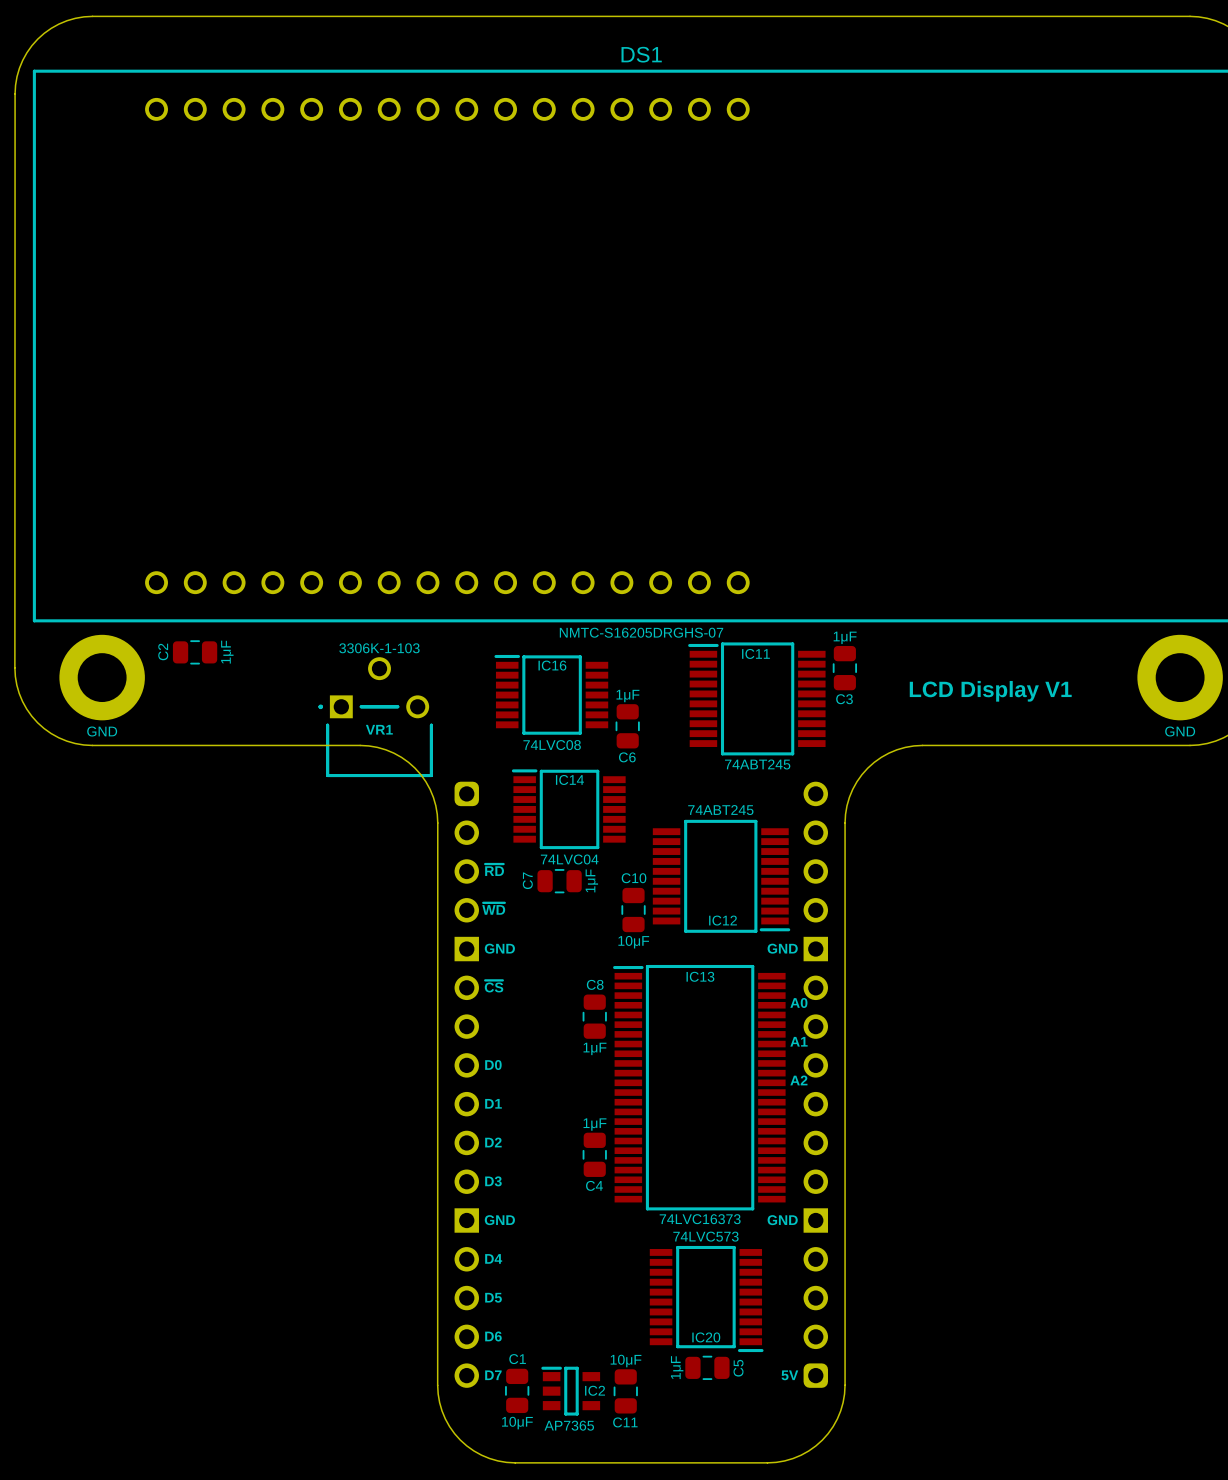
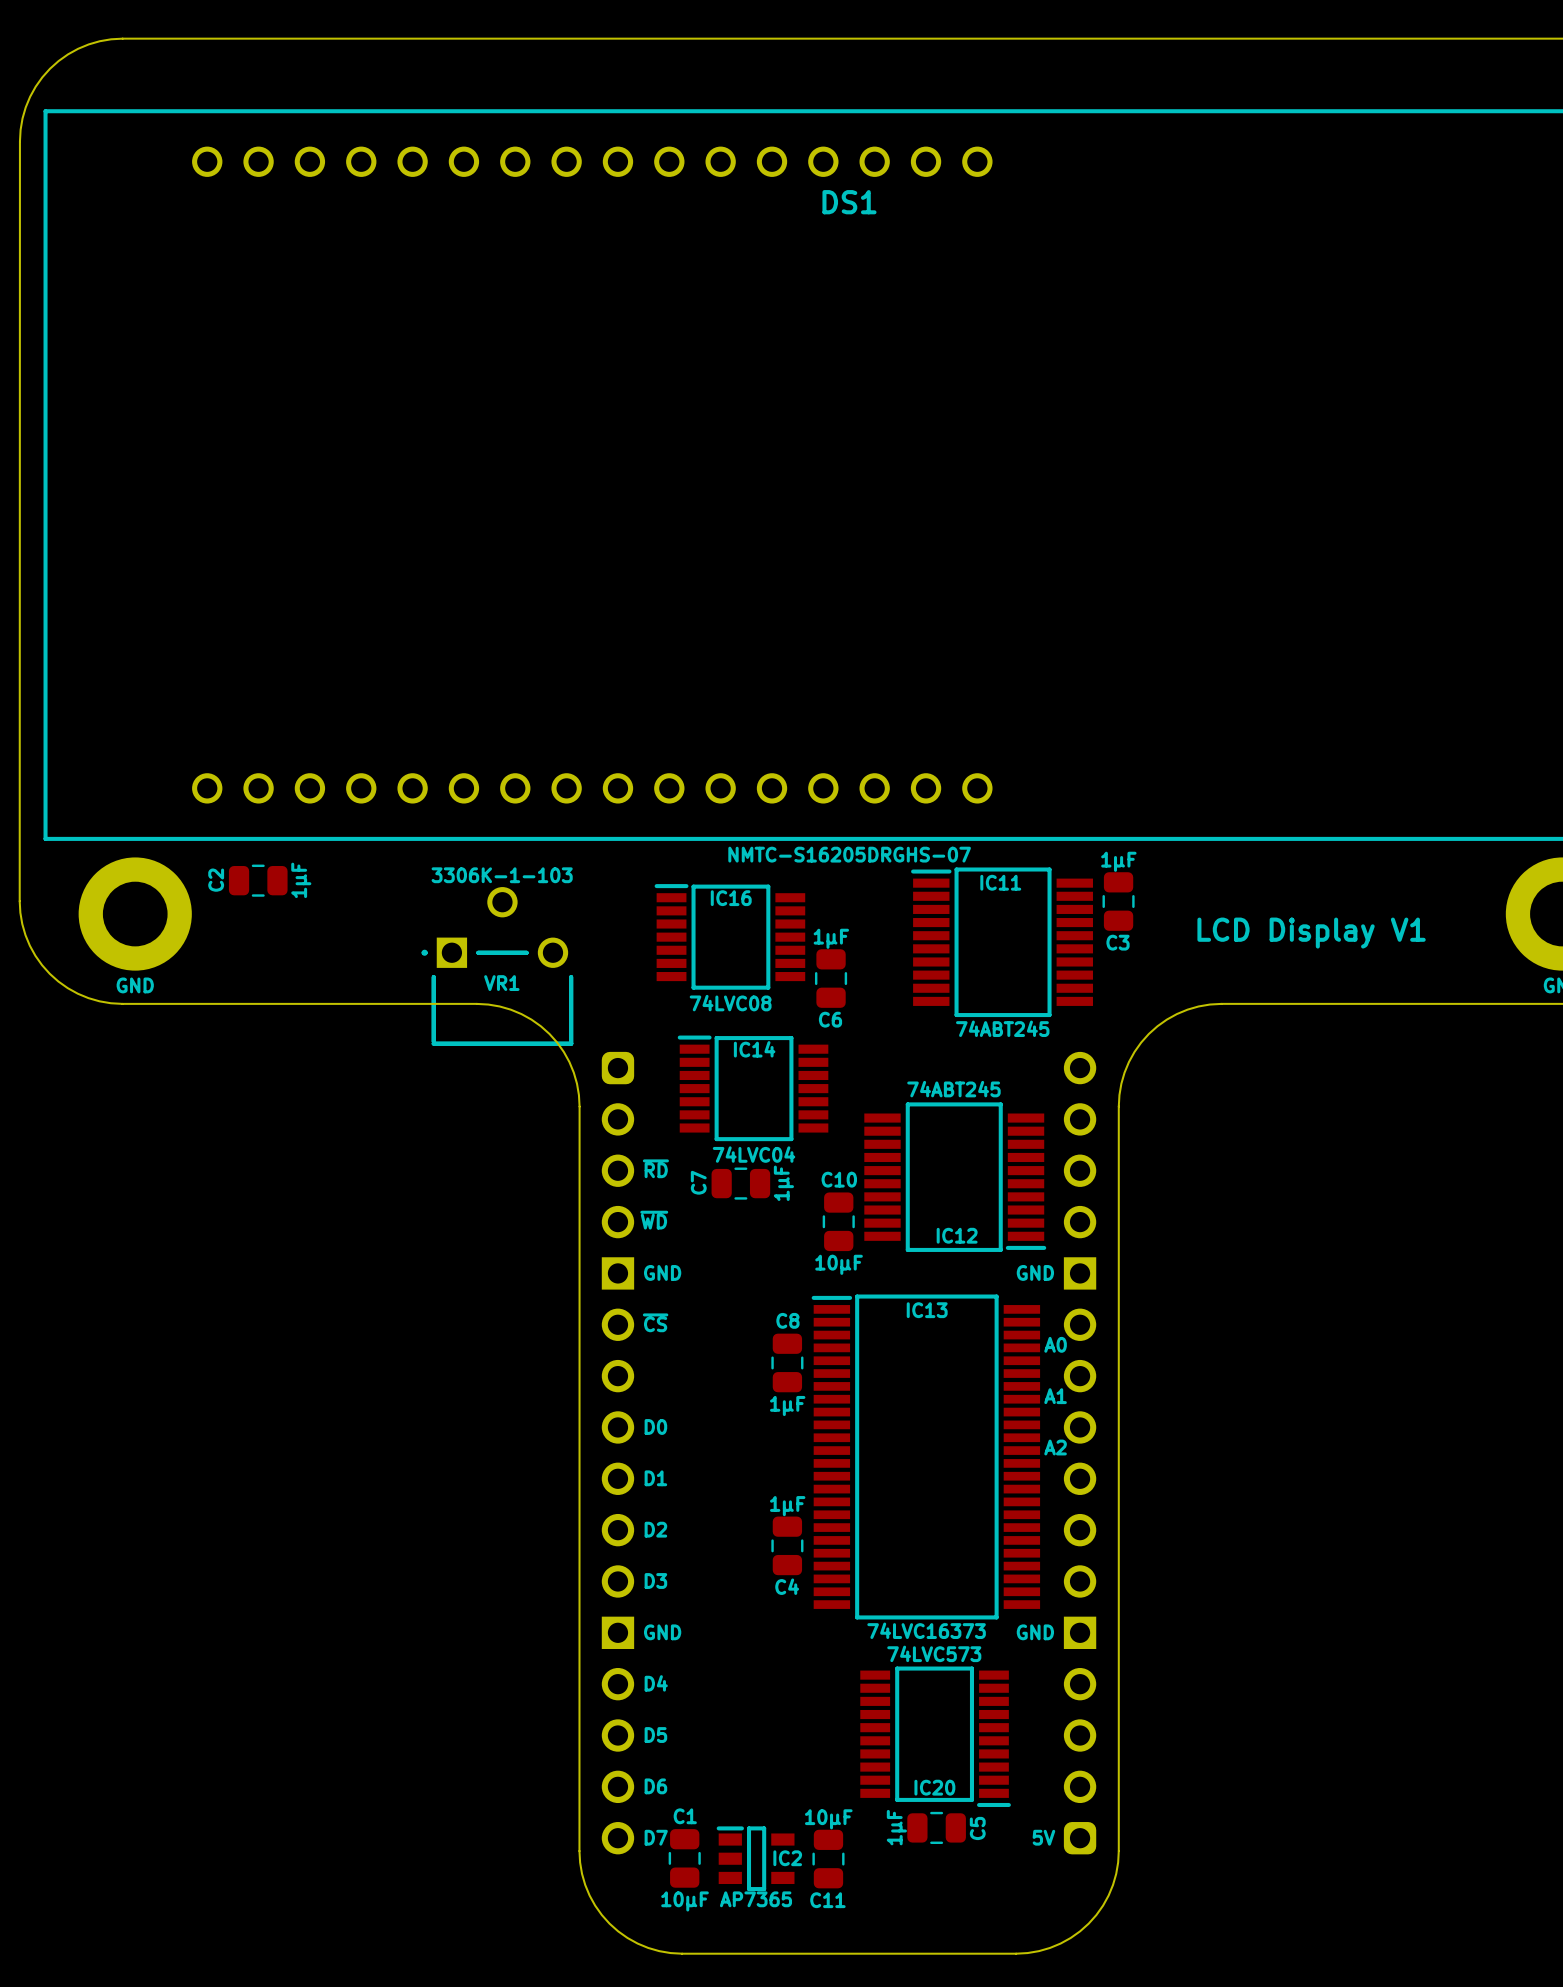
DS1 name position: DS1 (641, 54) -> DS1 (849, 202)
IC2 text: none -> AP7365 (755, 1899)
IC2 text: AP7365 (569, 1425) -> none

